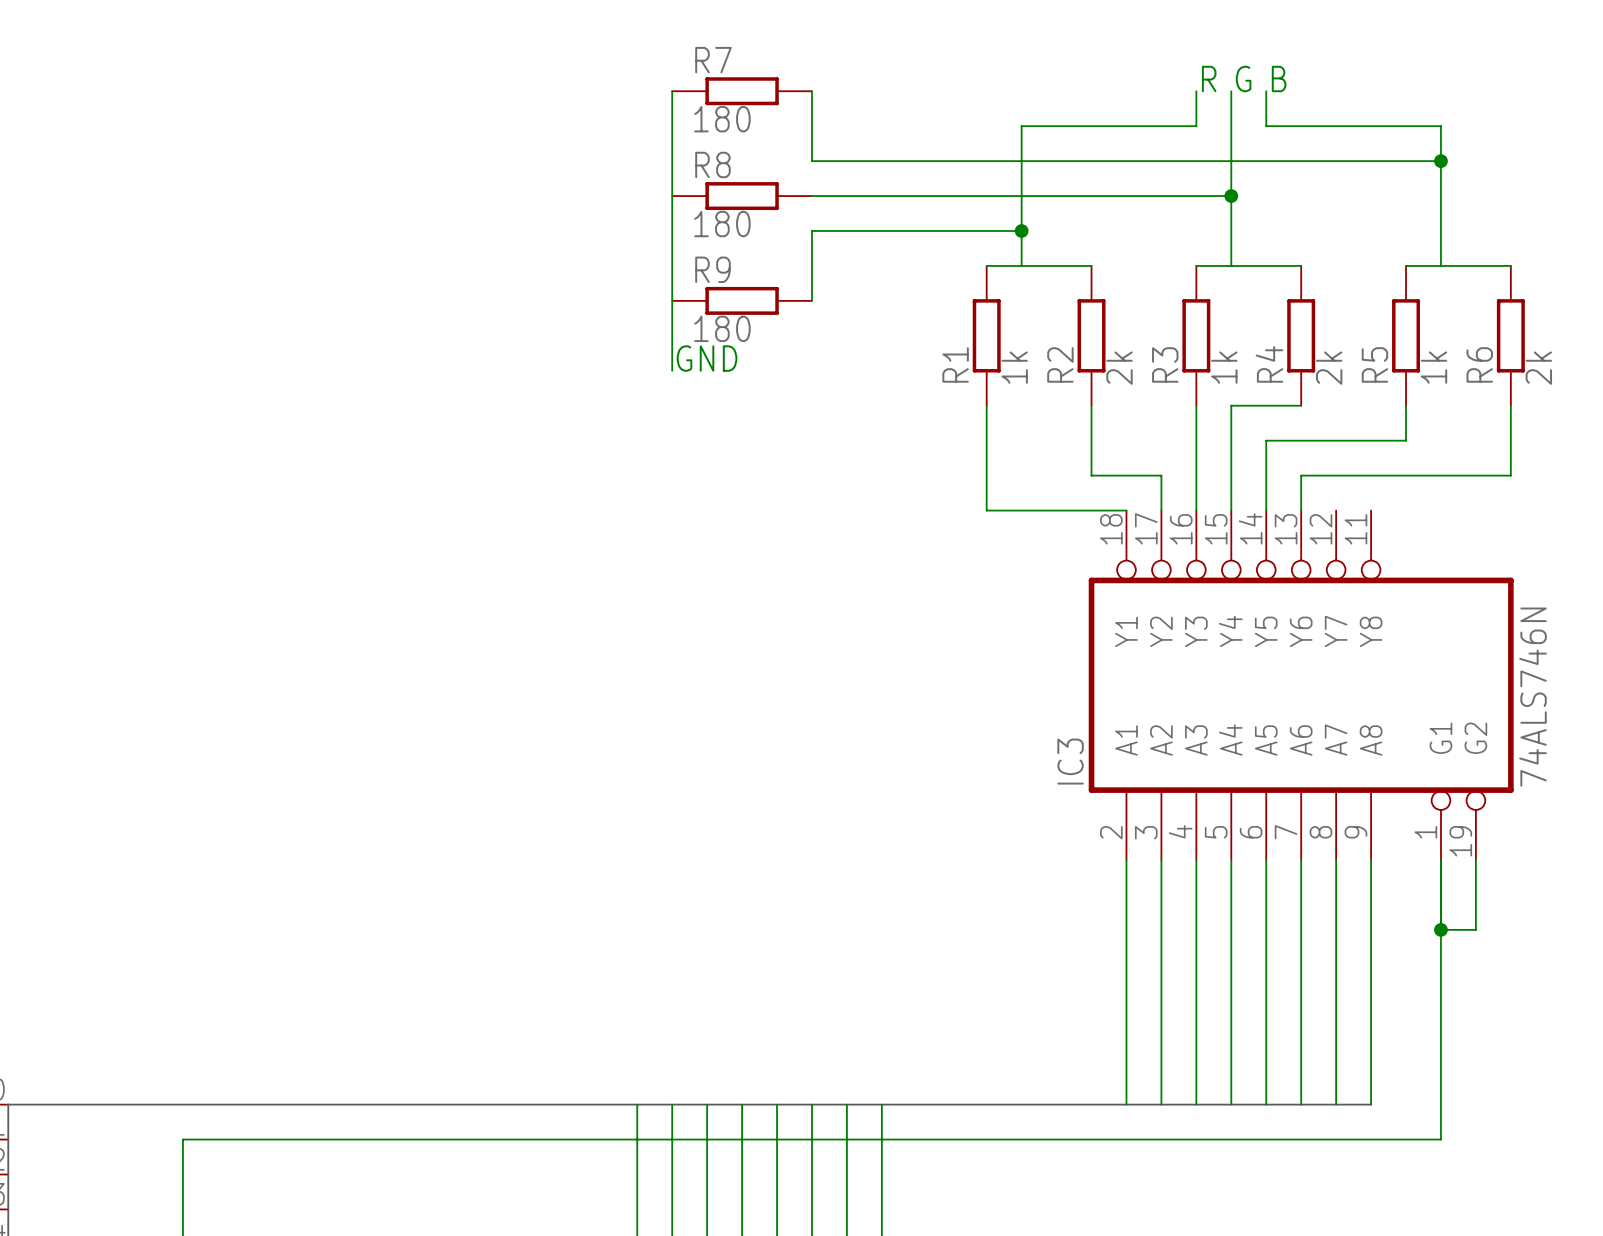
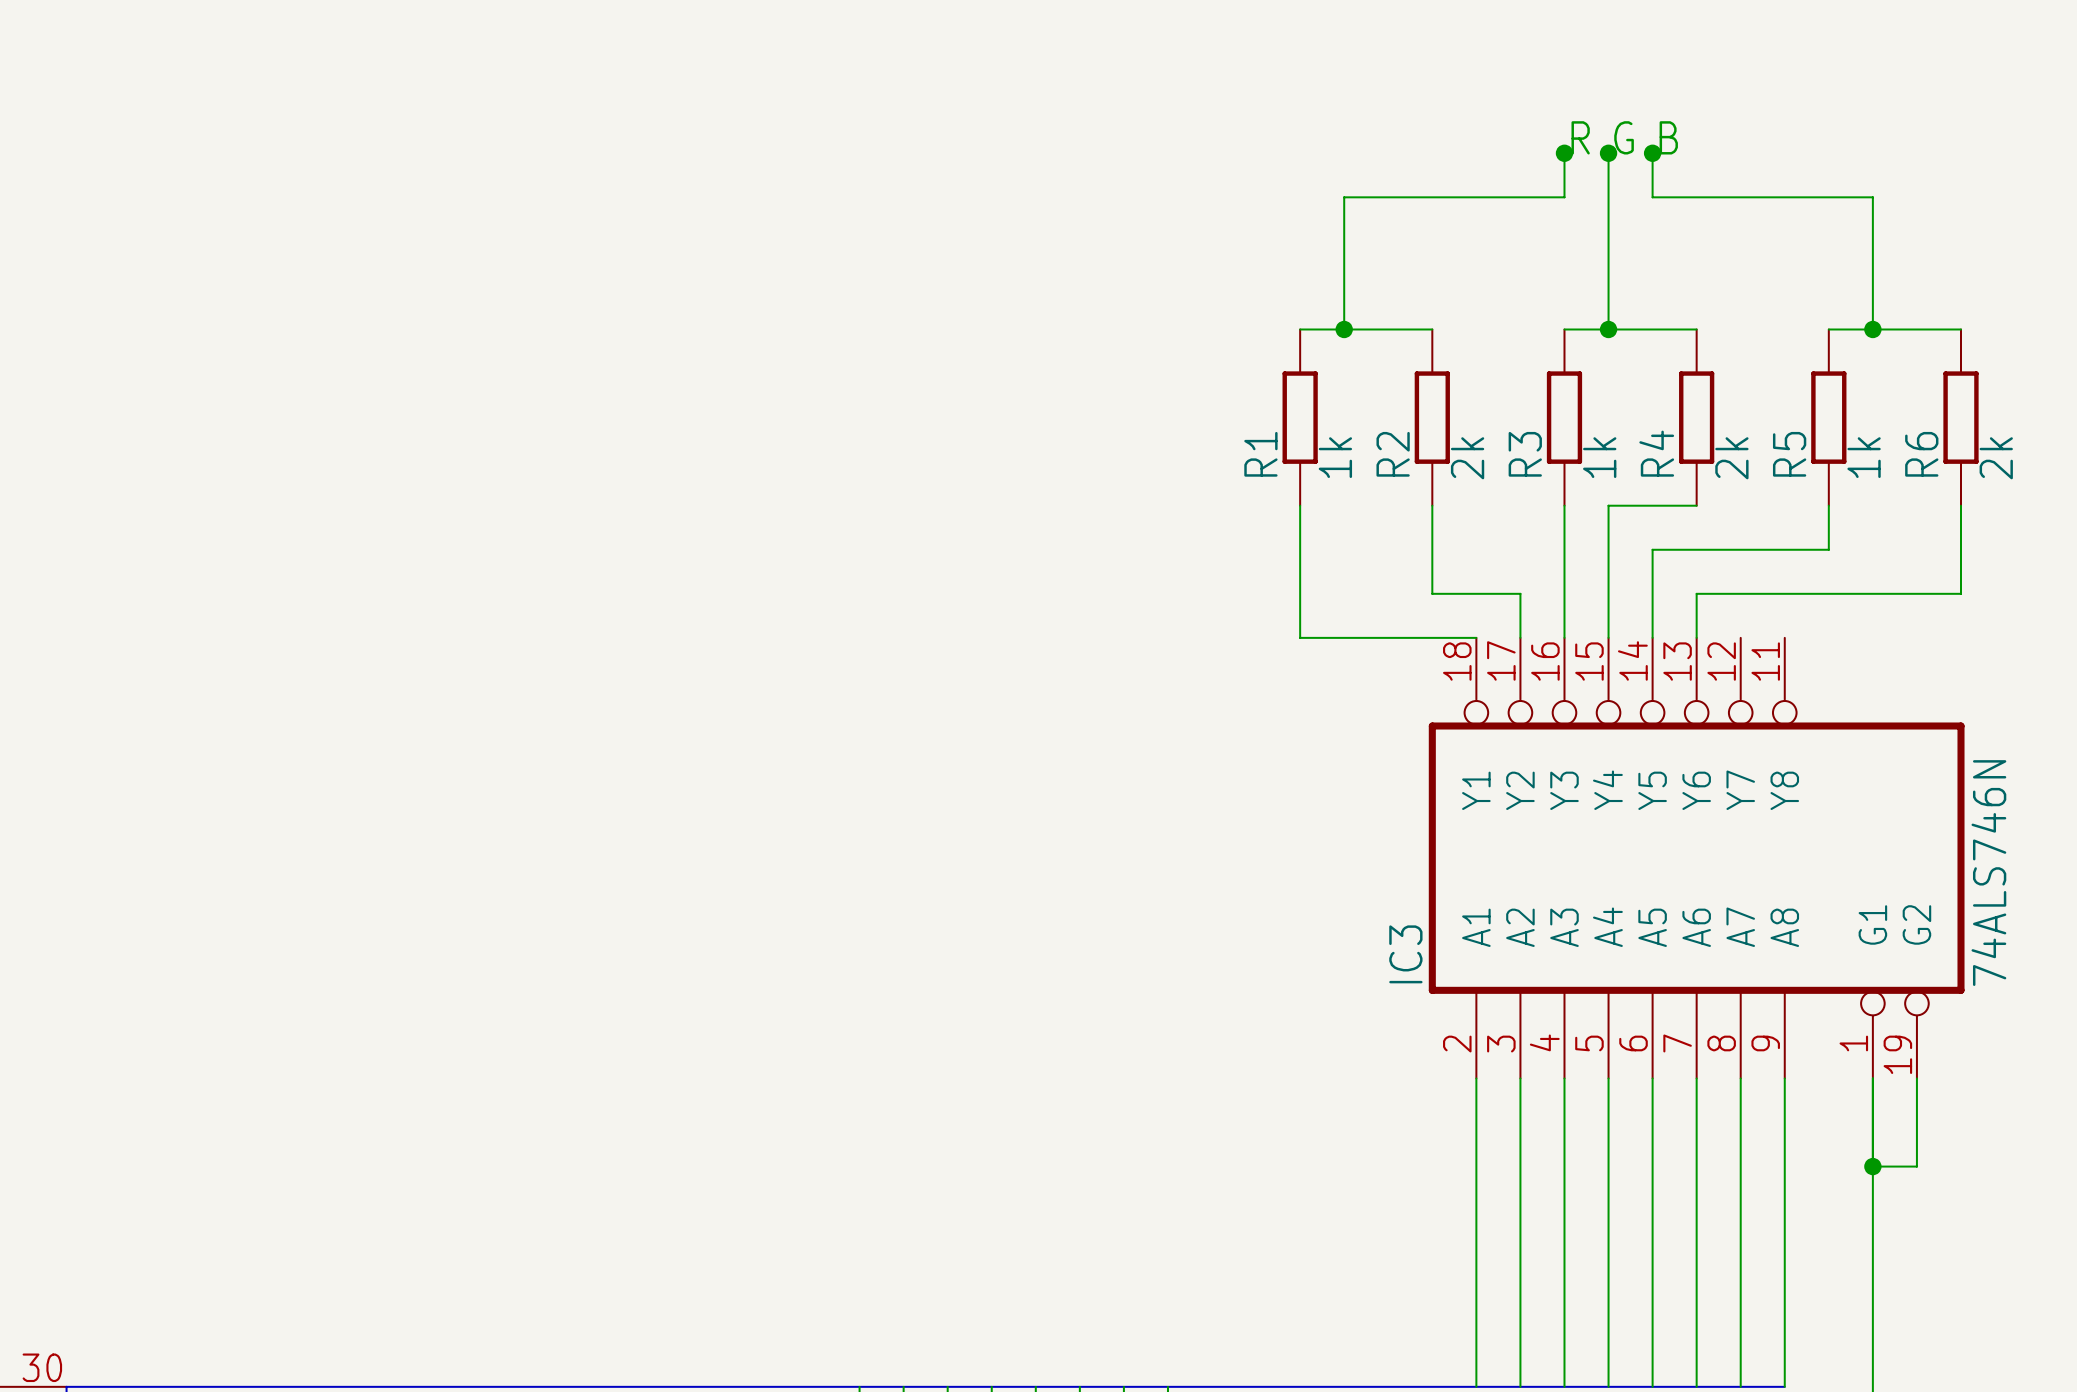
text position: R (1209, 79) -> R (1580, 137)
text position: G (1243, 79) -> G (1624, 137)
text position: B (1279, 79) -> B (1668, 137)
wire: (672, 91) (672, 370) -> none
R7: 180 (742, 91) -> none
wire: (811, 91) (811, 161) (1021, 161) (1021, 126) (1196, 126) (1196, 91) -> none
wire: (1231, 91) (1231, 126) -> (1652, 153) (1652, 197)
wire: (1266, 91) (1266, 126) (1440, 126) (1440, 161) -> none
junction: none -> (1564, 153)
junction: none -> (1608, 153)
junction: none -> (1652, 153)
wire: (1196, 161) (1266, 161) -> (1564, 197) (1564, 153)
junction: (1440, 161) -> none
R8: 180 (742, 196) -> none
wire: (811, 196) (1231, 196) -> none
junction: (1231, 196) -> none
wire: (1021, 231) (811, 231) (811, 300) -> none
junction position: (1021, 231) -> (1344, 329)
junction: none -> (1608, 329)
junction: none -> (1872, 329)
R9: 180 (742, 300) -> none
text: GND (707, 358) -> none

